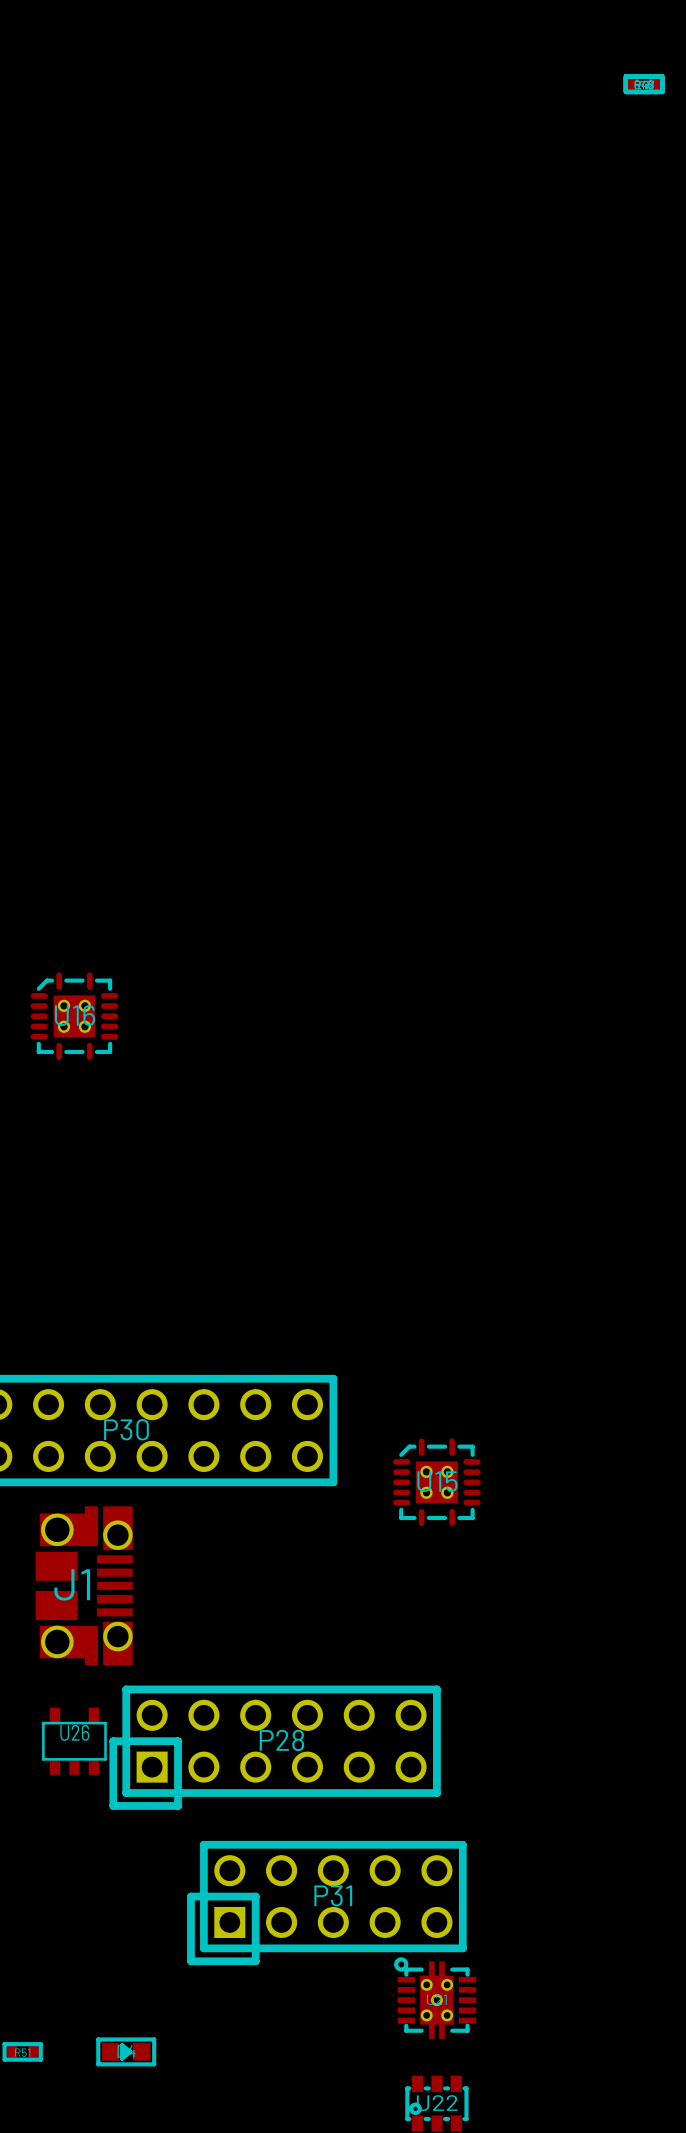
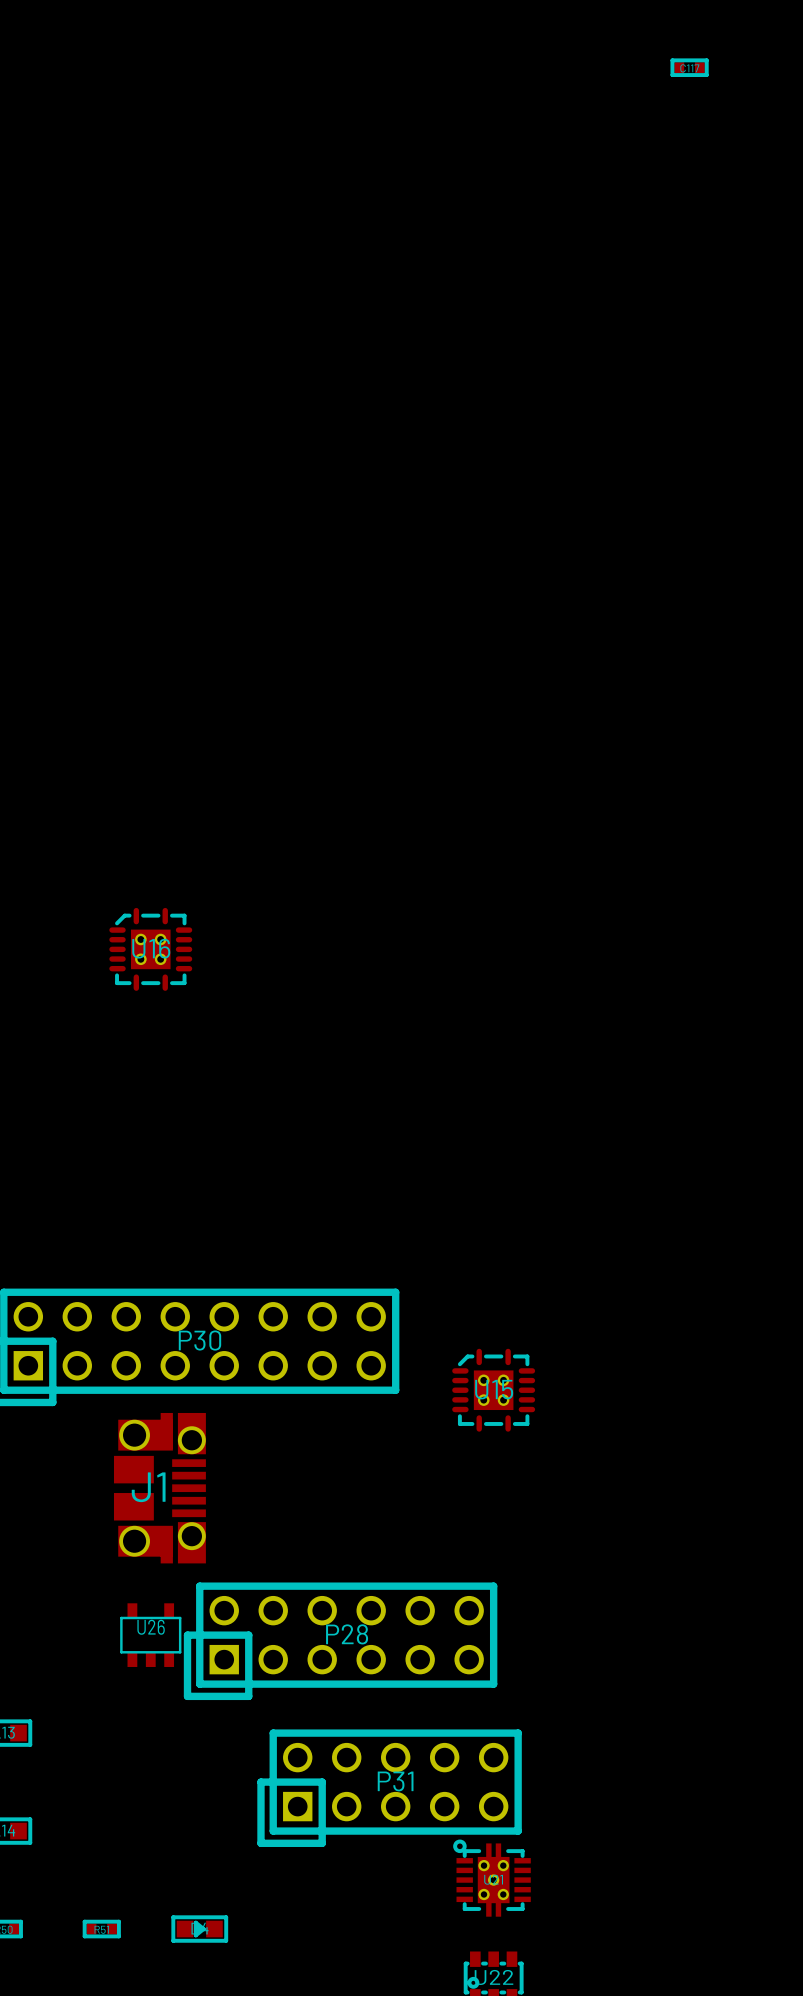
part: (644, 84) -> none
part: (644, 84) -> none
part: (644, 84) -> none
part: (644, 84) -> none
part: (644, 84) -> none

